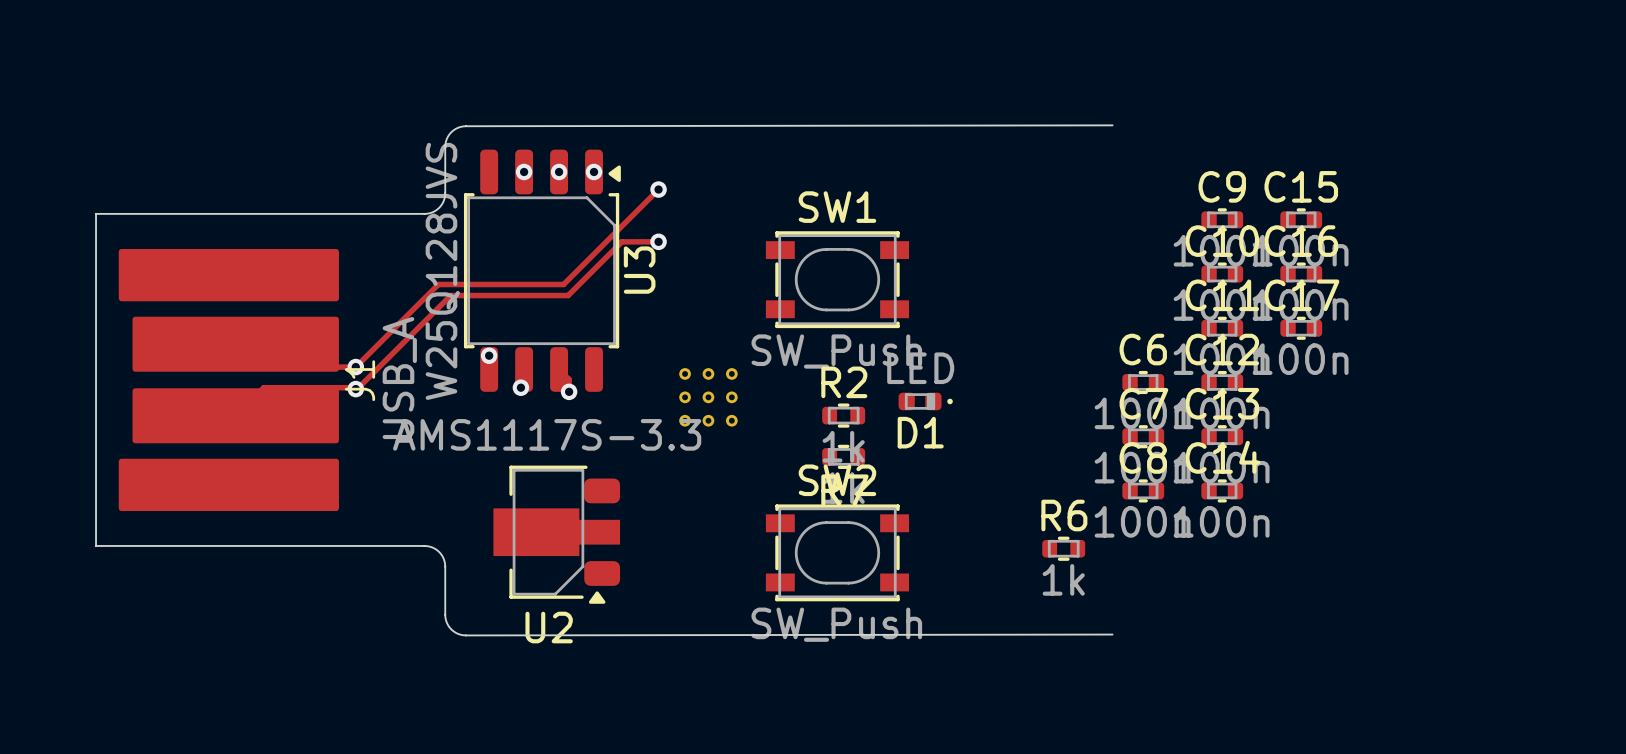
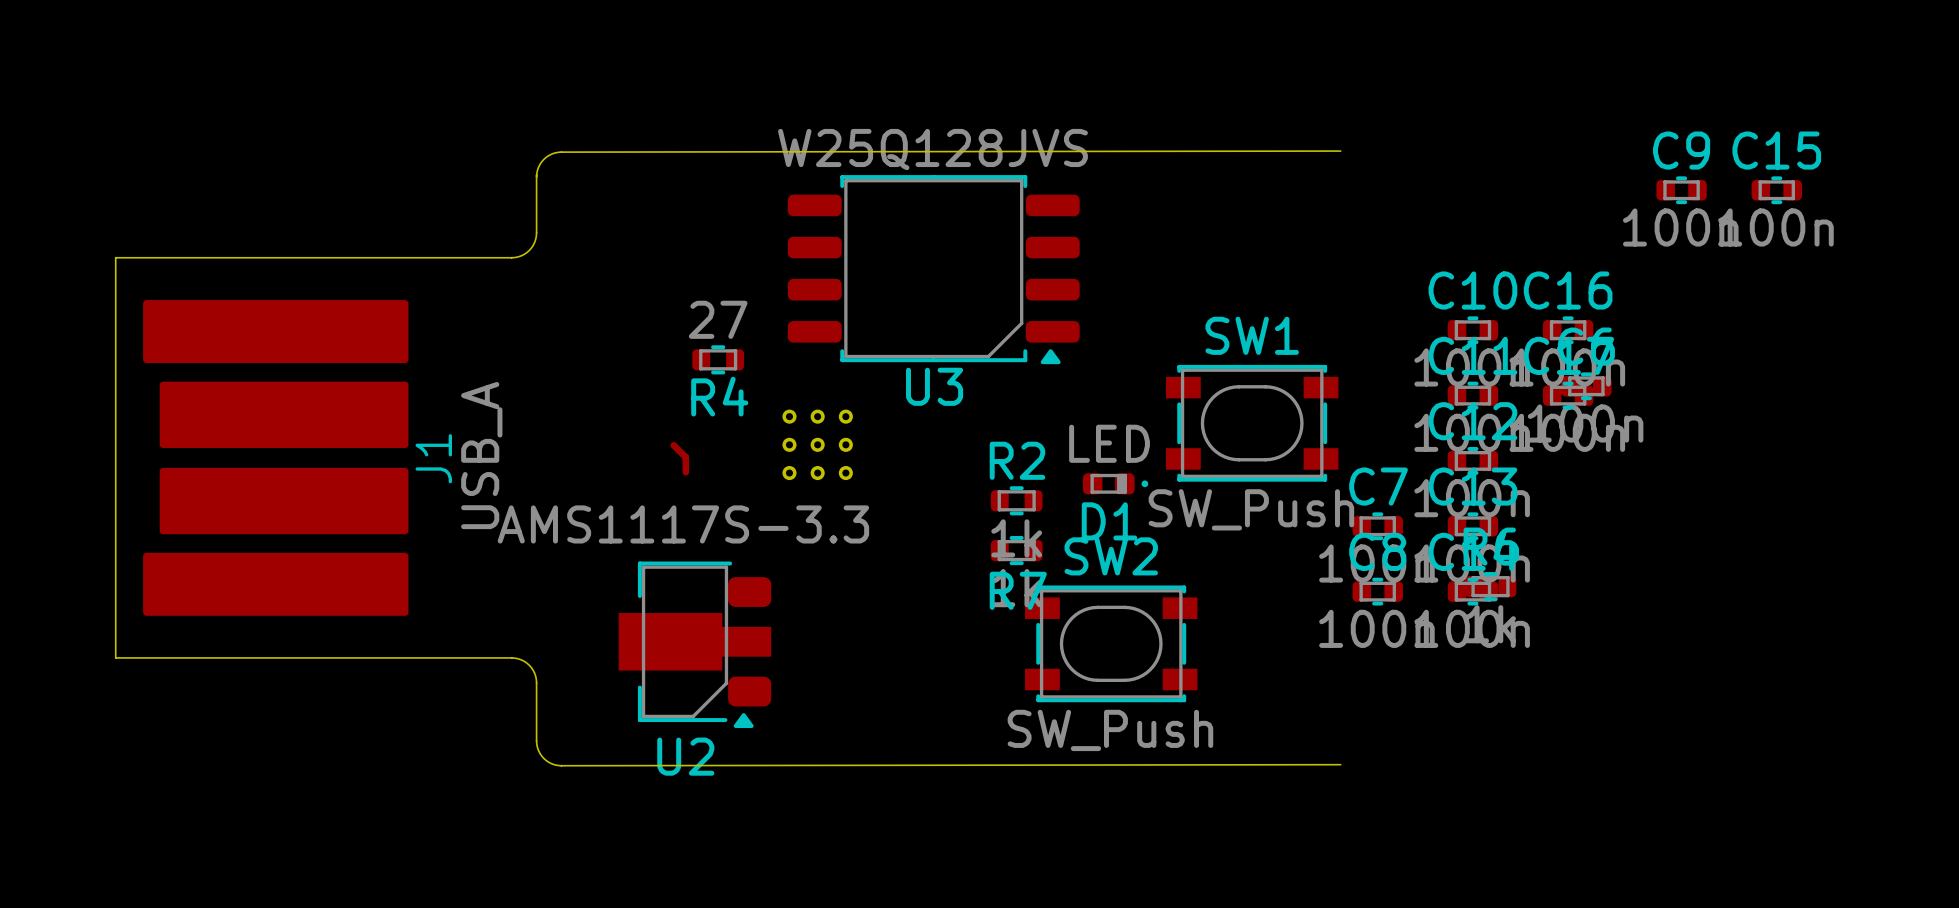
via: (524, 171) -> none
via: (559, 171) -> none
via: (594, 171) -> none
track: (658, 189) (563, 284) (438, 284) (355, 367) (258, 367) (235, 344) -> none
via: (658, 189) -> none
C9 position: (1222, 219) -> (1681, 190)
C15 position: (1301, 219) -> (1776, 190)
track: (658, 241) (621, 241) (568, 295) (450, 295) (357, 389) (263, 387) (235, 415) -> none
via: (658, 241) -> none
U3 rotation: 0° (542, 270) -> 90° clockwise (933, 269)
U3 position: (542, 270) -> (933, 269)
SW1 position: (837, 279) -> (1252, 423)
R4: none -> 27 (718, 359)
via: (489, 355) -> none
via: (355, 367) -> none
C6 position: (1143, 382) -> (1586, 386)
via: (520, 387) -> none
via: (355, 389) -> none
via: (569, 391) -> none
part position: (708, 397) -> (817, 444)
U2 position: (556, 534) -> (694, 644)
R6 position: (1063, 548) -> (1490, 586)
SW2 position: (837, 552) -> (1111, 643)

